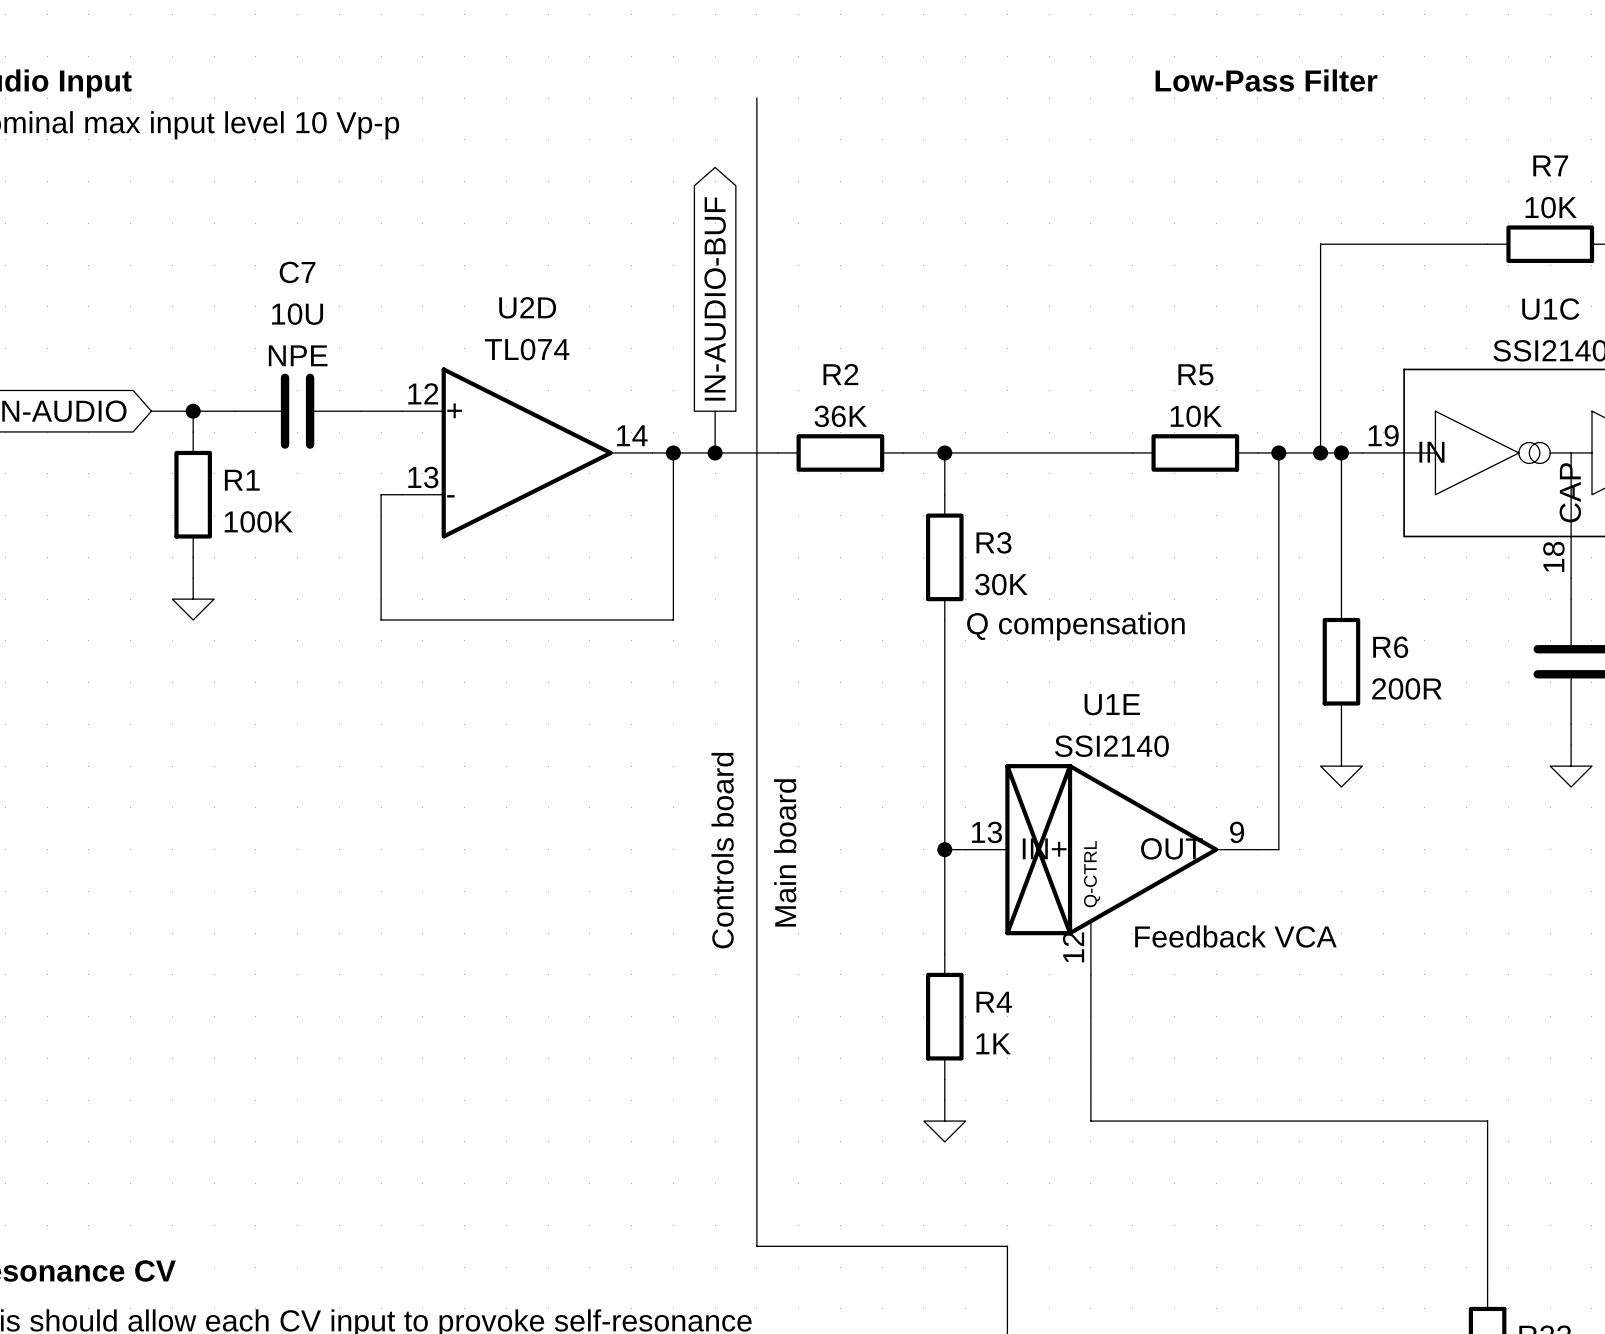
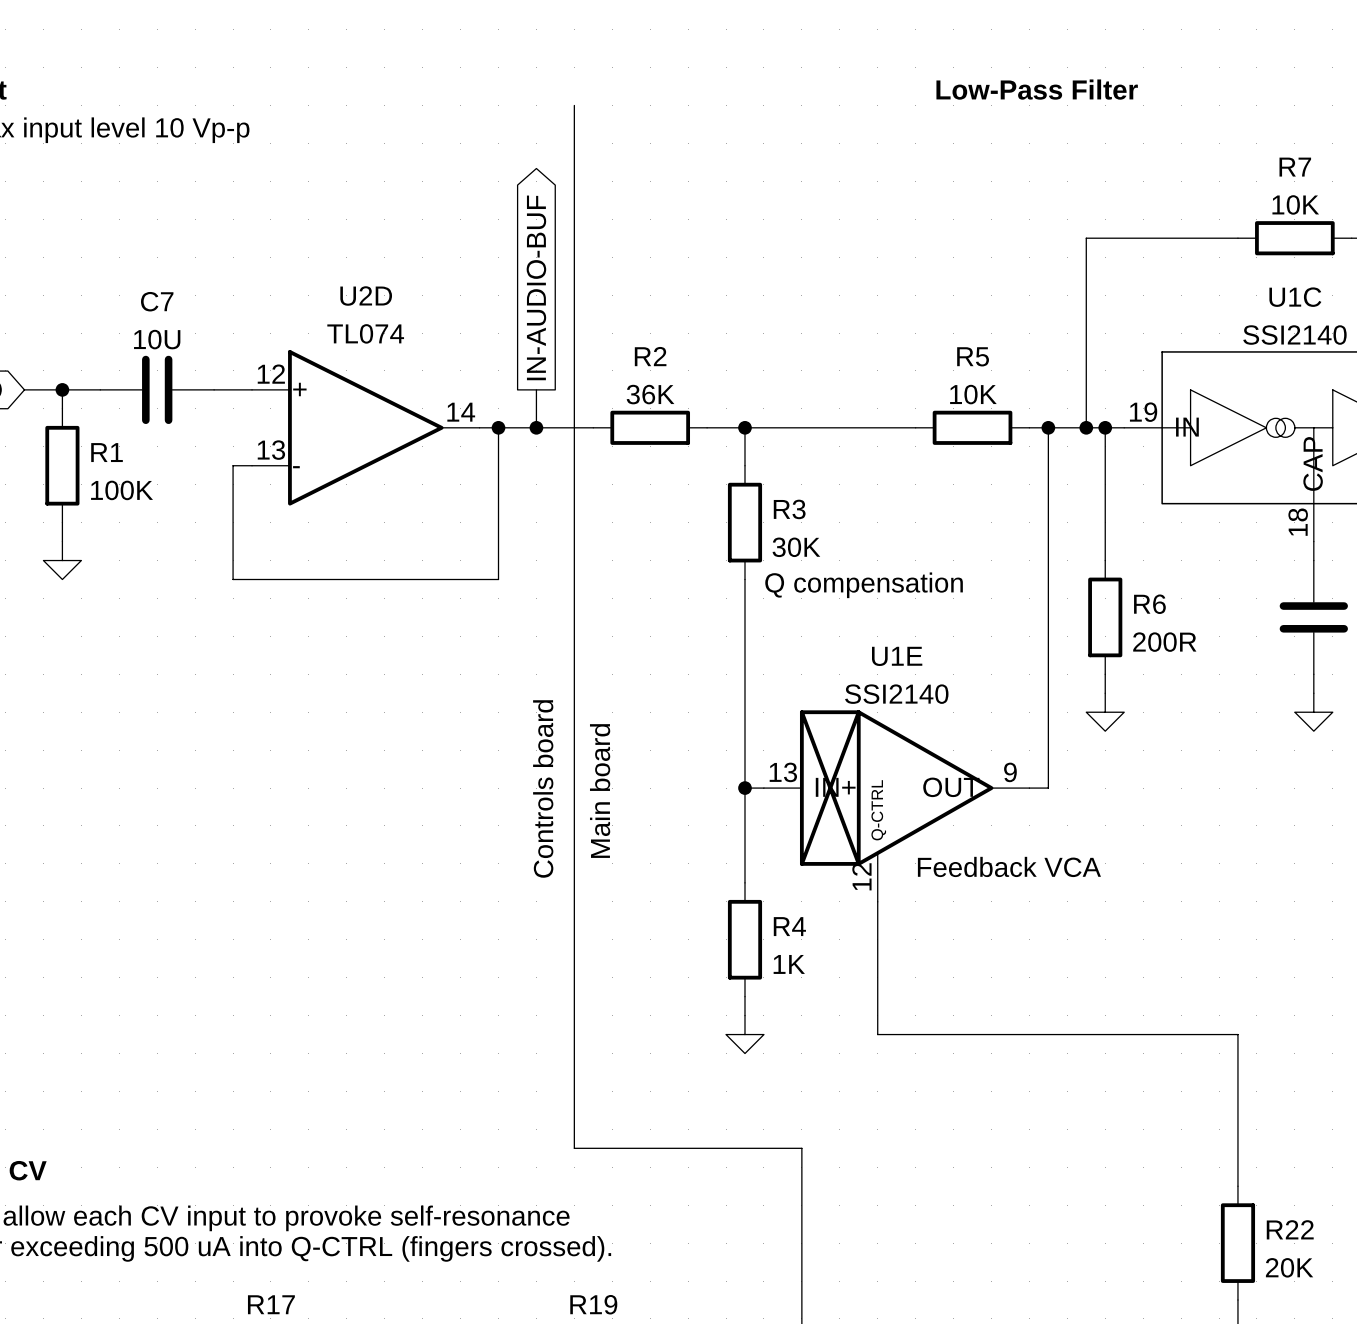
C7 name position: C7 (297, 272) -> C7 (157, 301)
C7 value position: 10U (297, 314) -> 10U (157, 339)
C7 text: NPE (298, 355) -> none

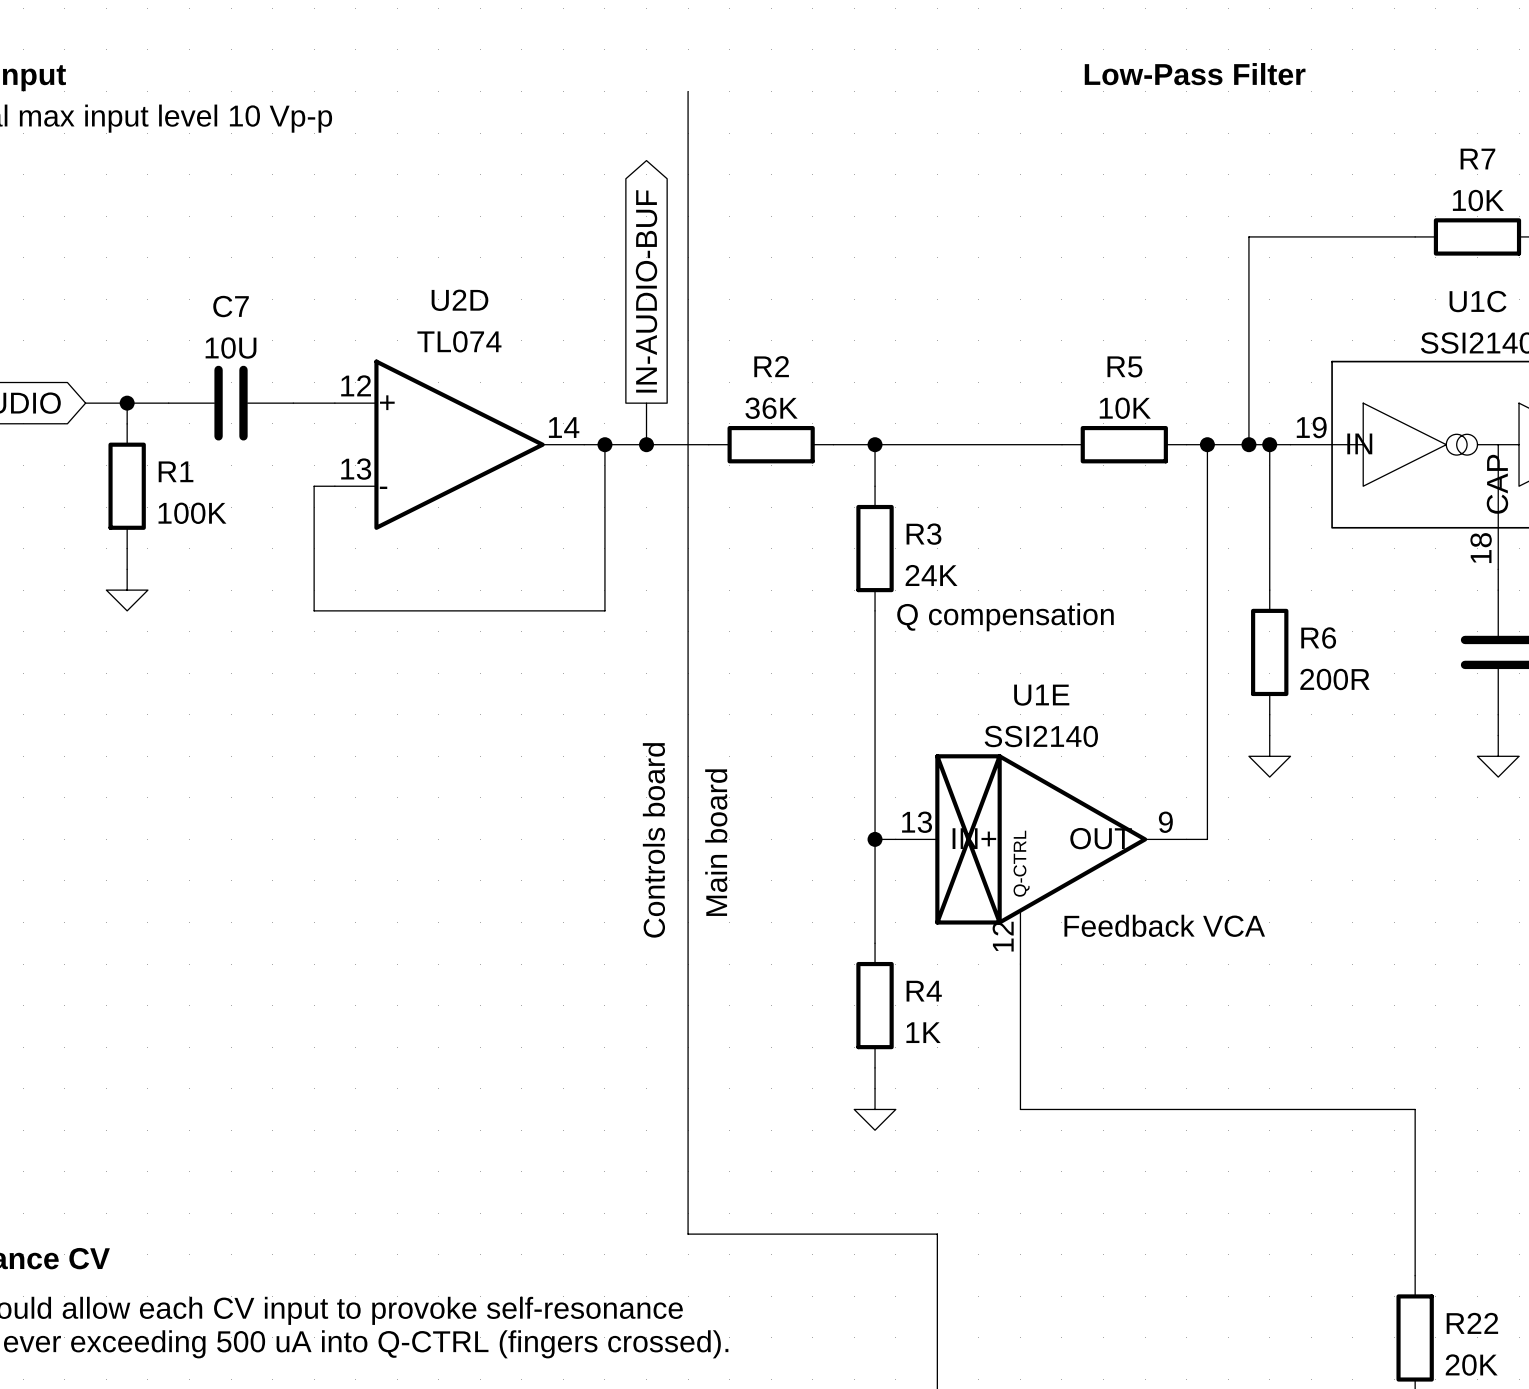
R3 value: 30K (796, 547) -> 24K (931, 575)

